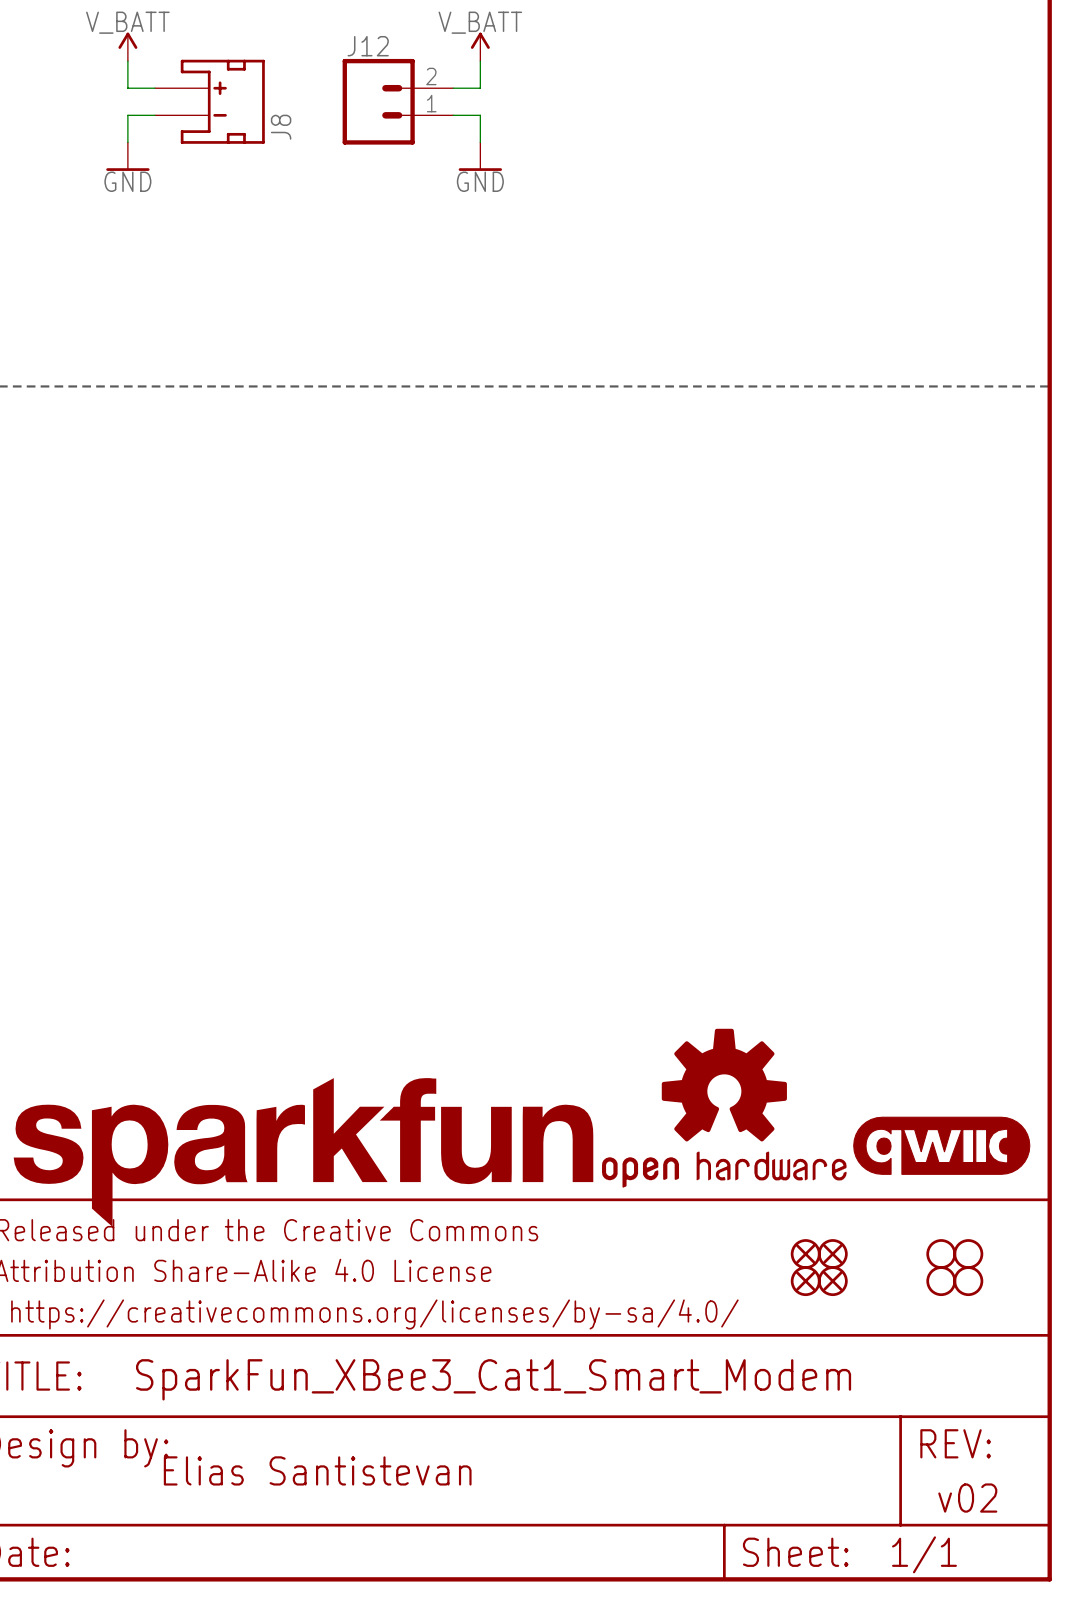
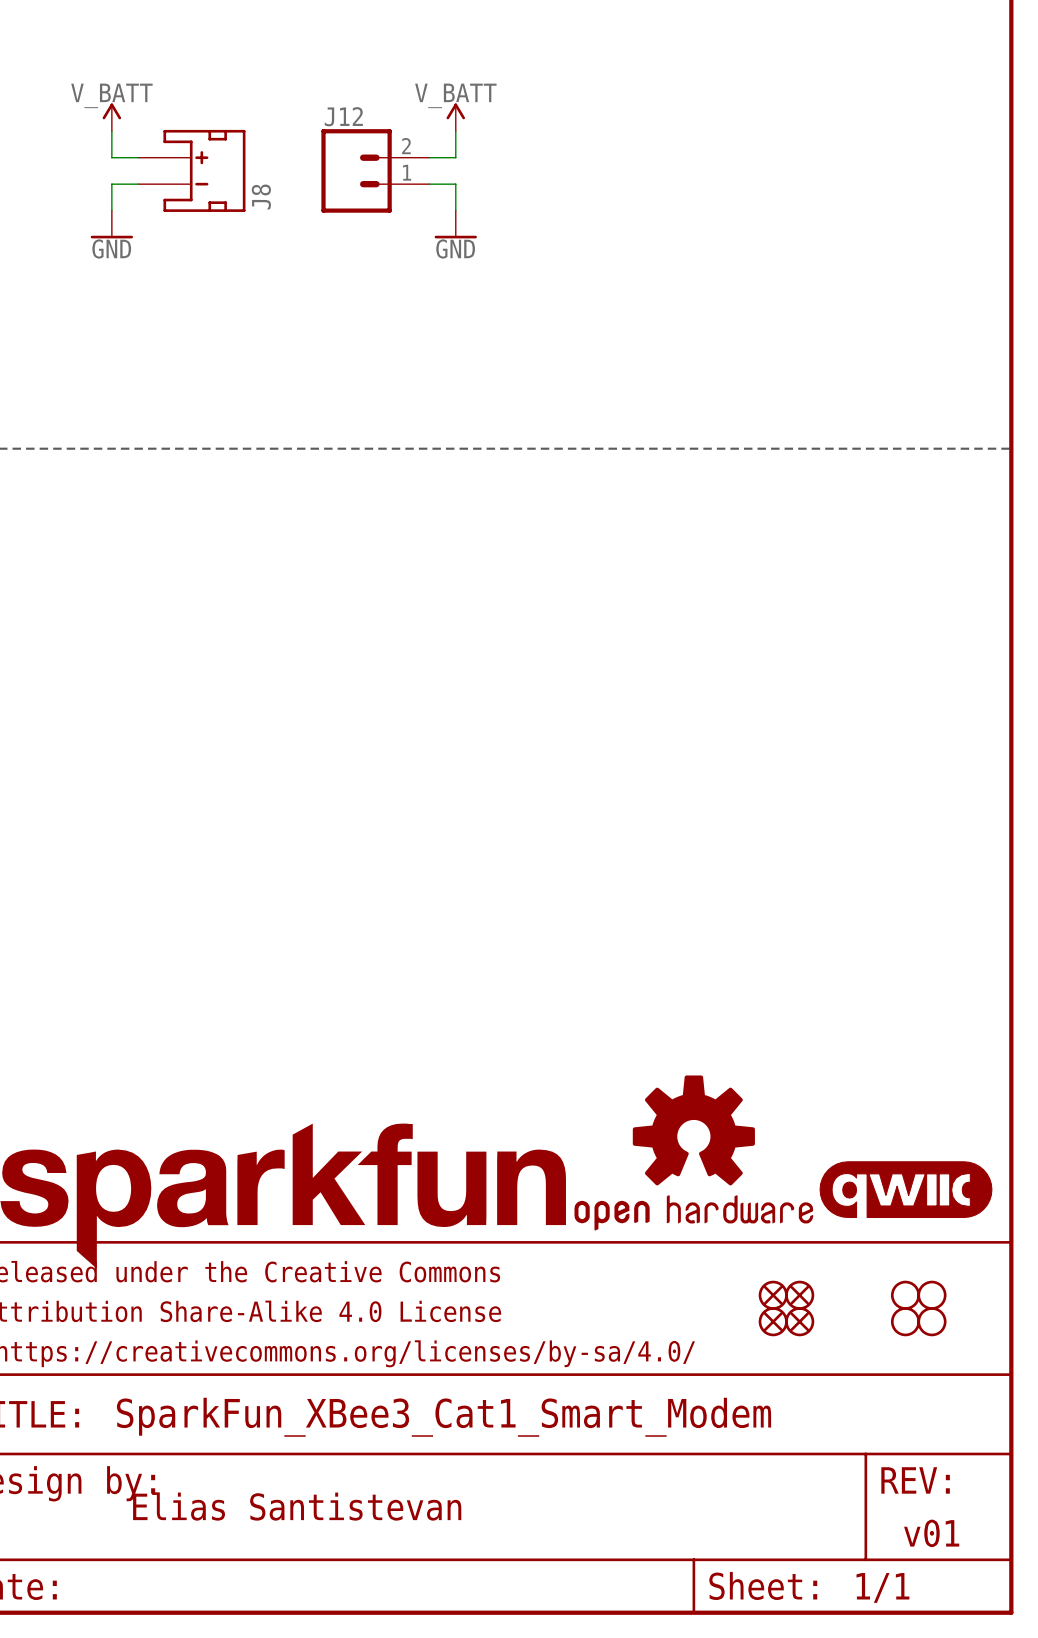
text: v02 (967, 1498) -> v01 (931, 1533)

